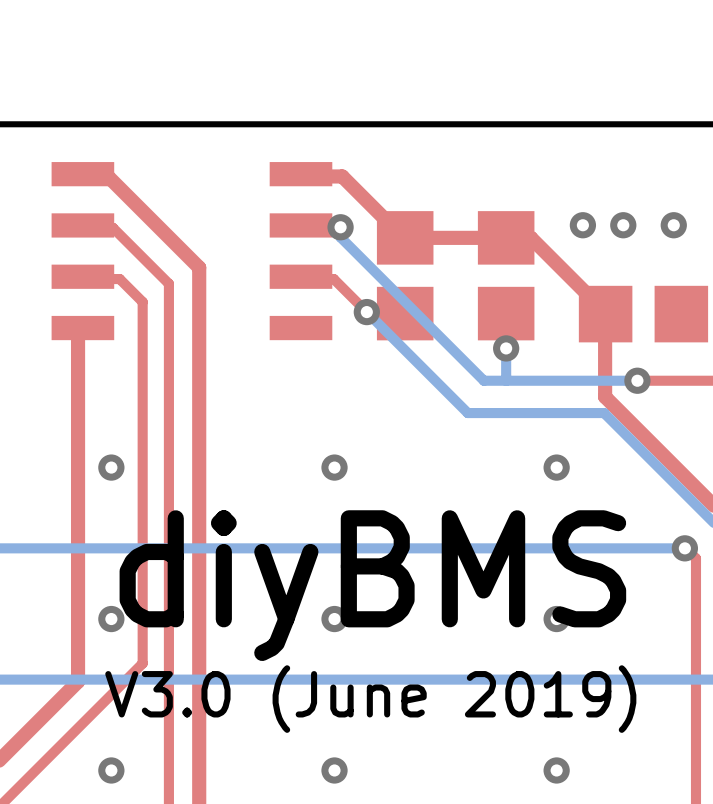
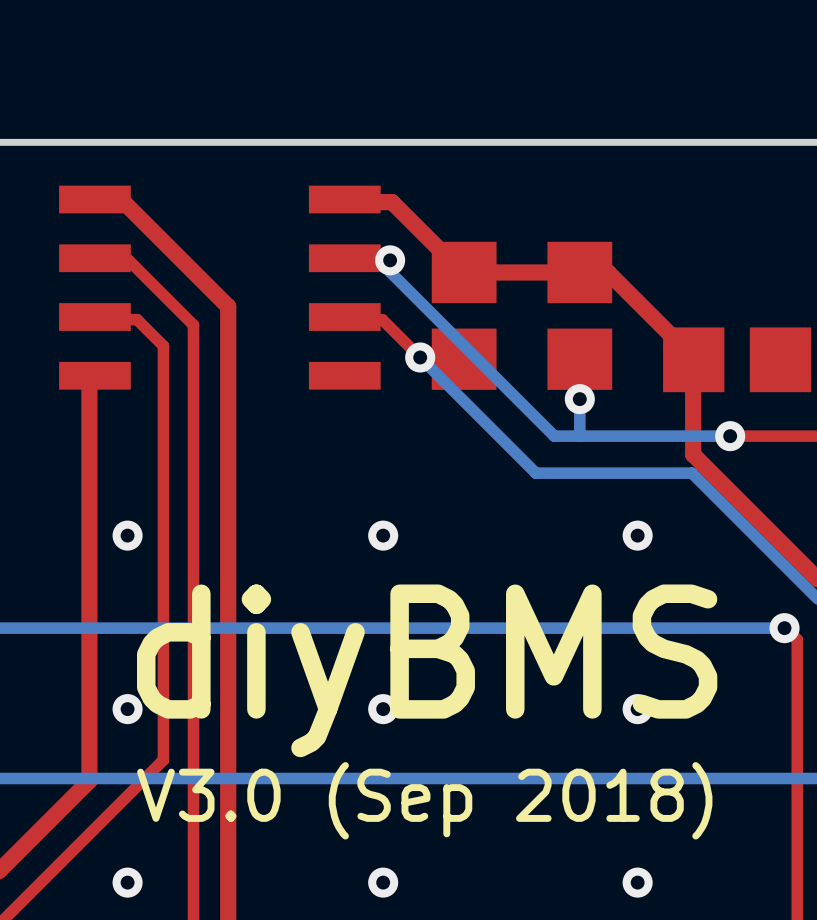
via: (582, 225) -> none
via: (623, 225) -> none
via: (673, 225) -> none
text: V3.0 (June 2019) (370, 699) -> V3.0 (Sep 2018) (424, 800)

